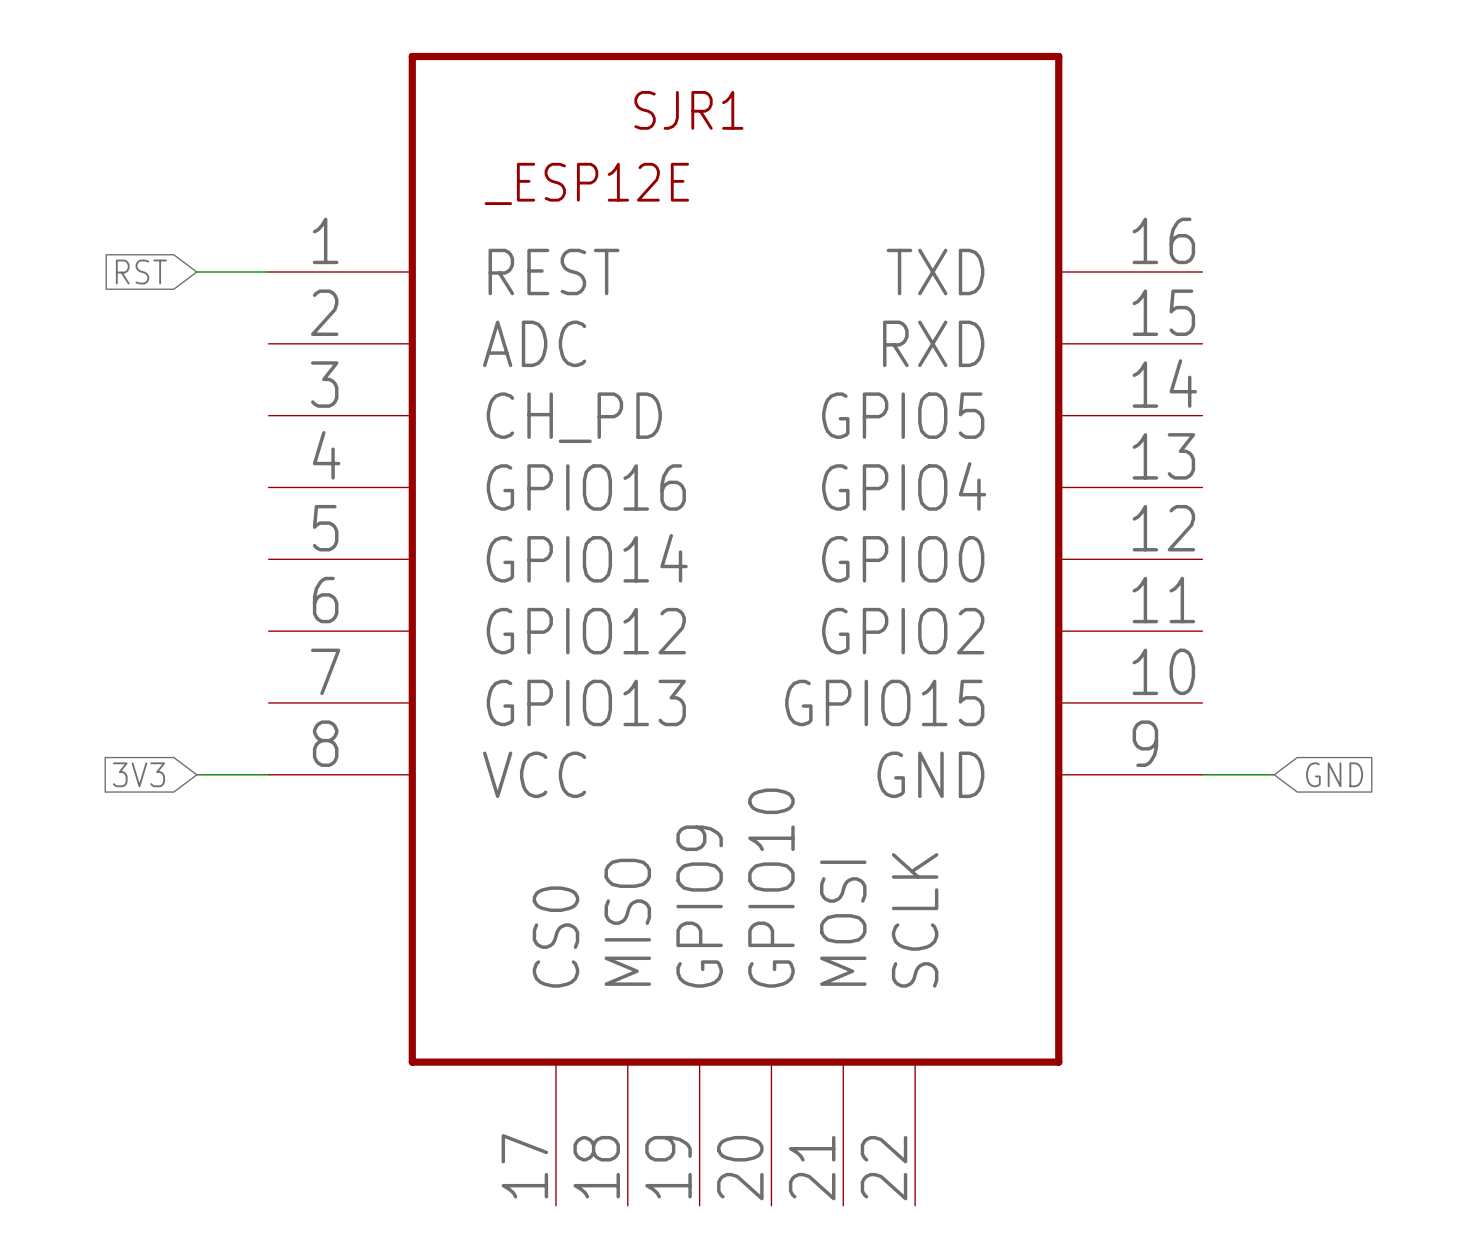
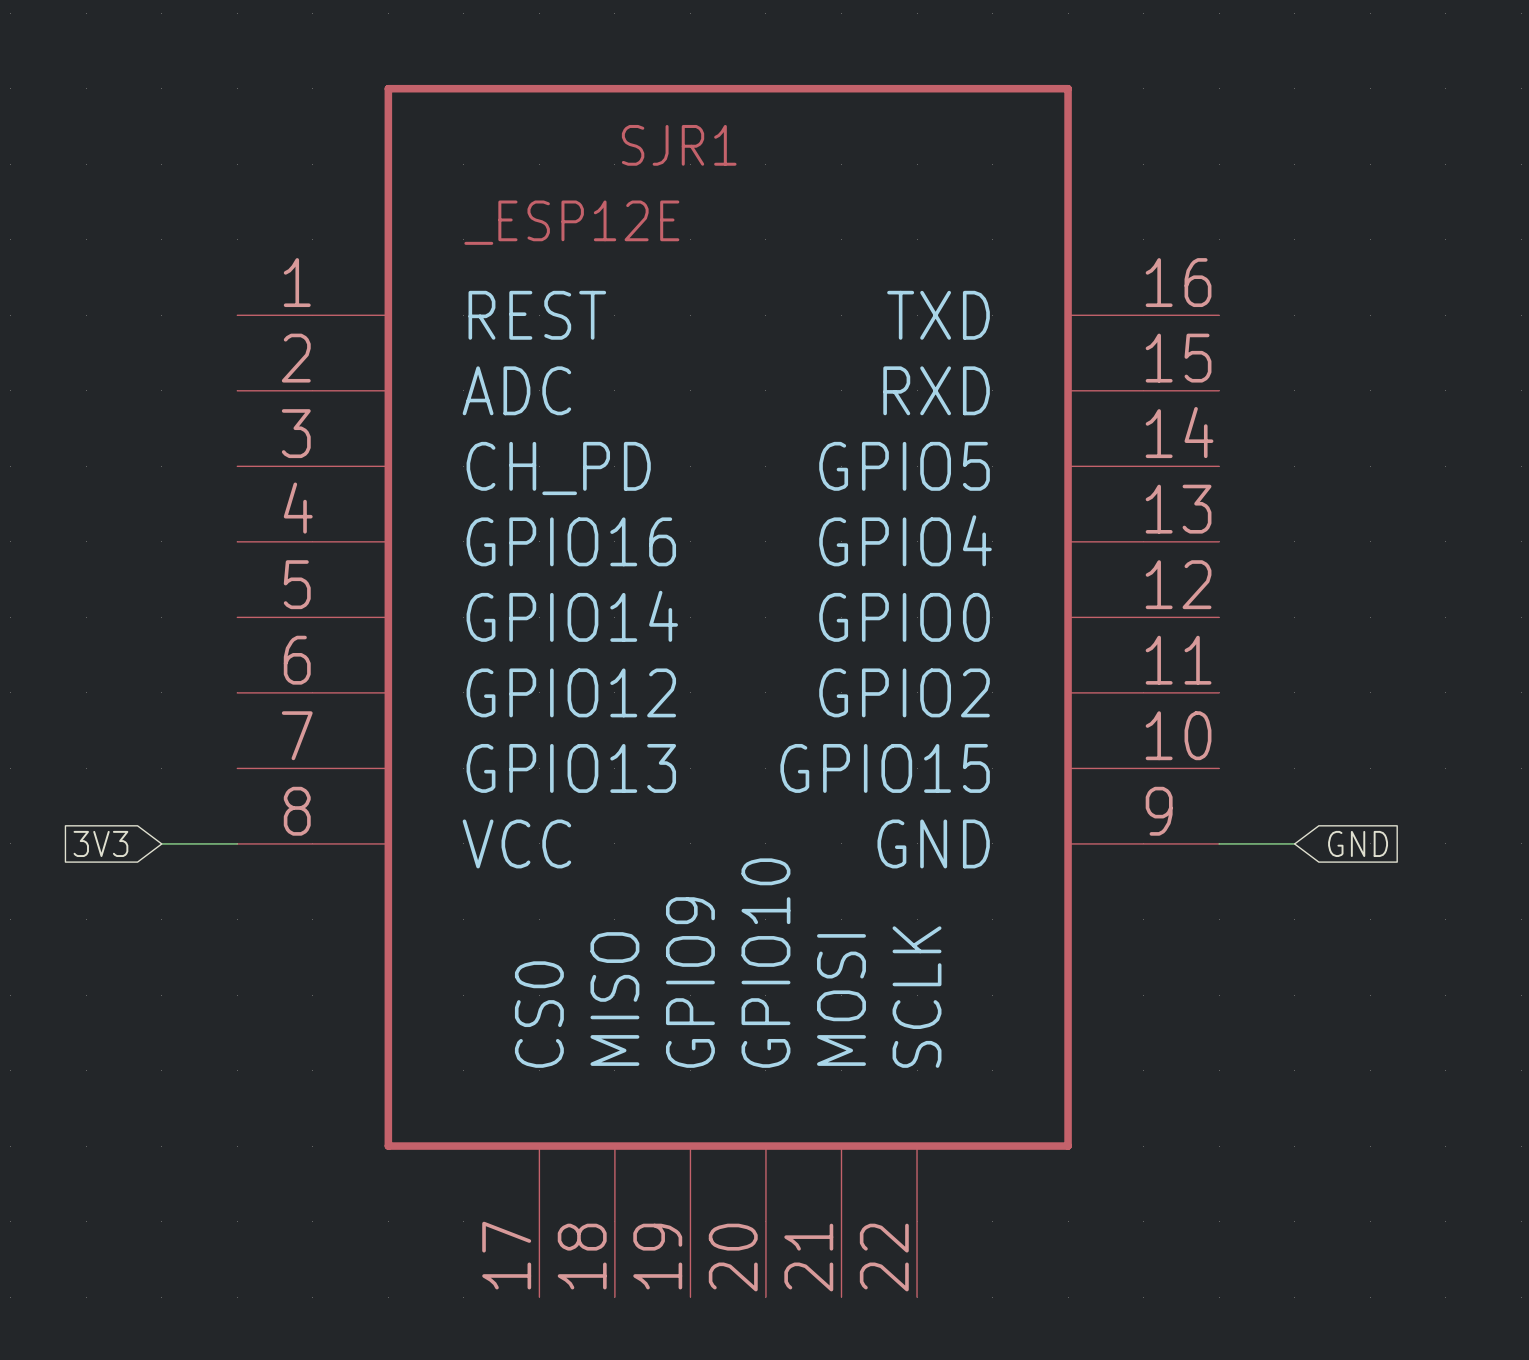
global label: RST (141, 271) -> none
wire: (196, 271) (268, 271) -> none

